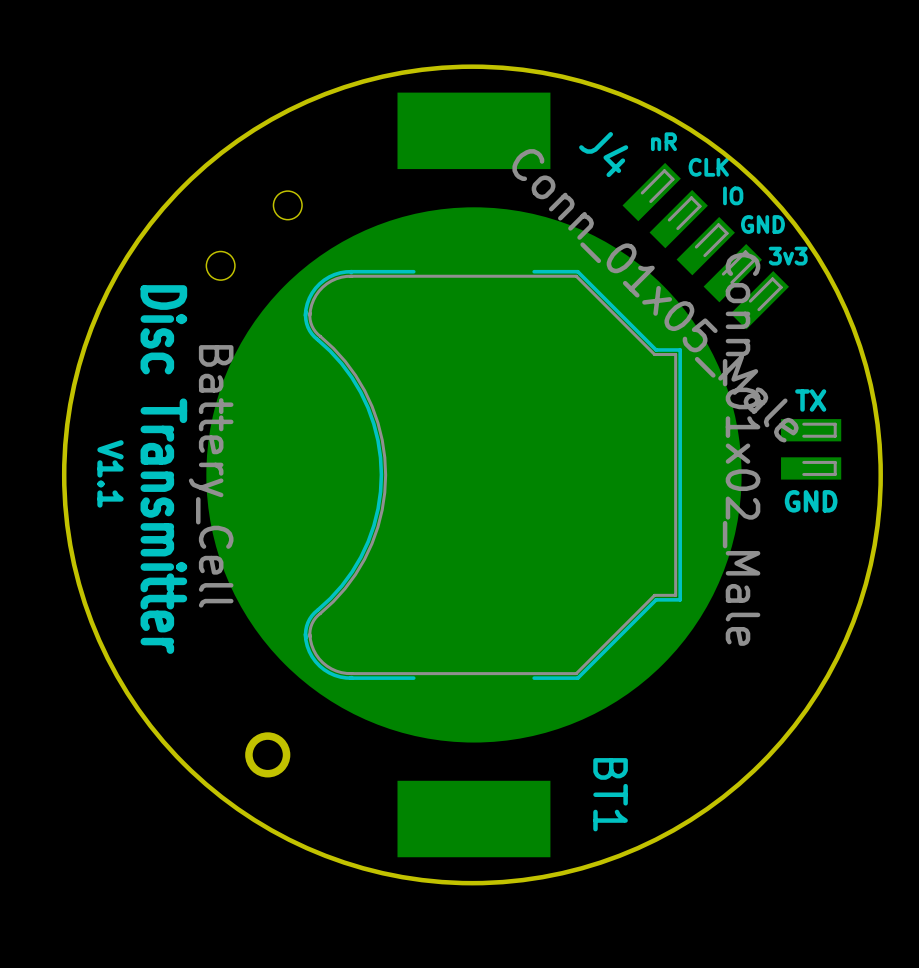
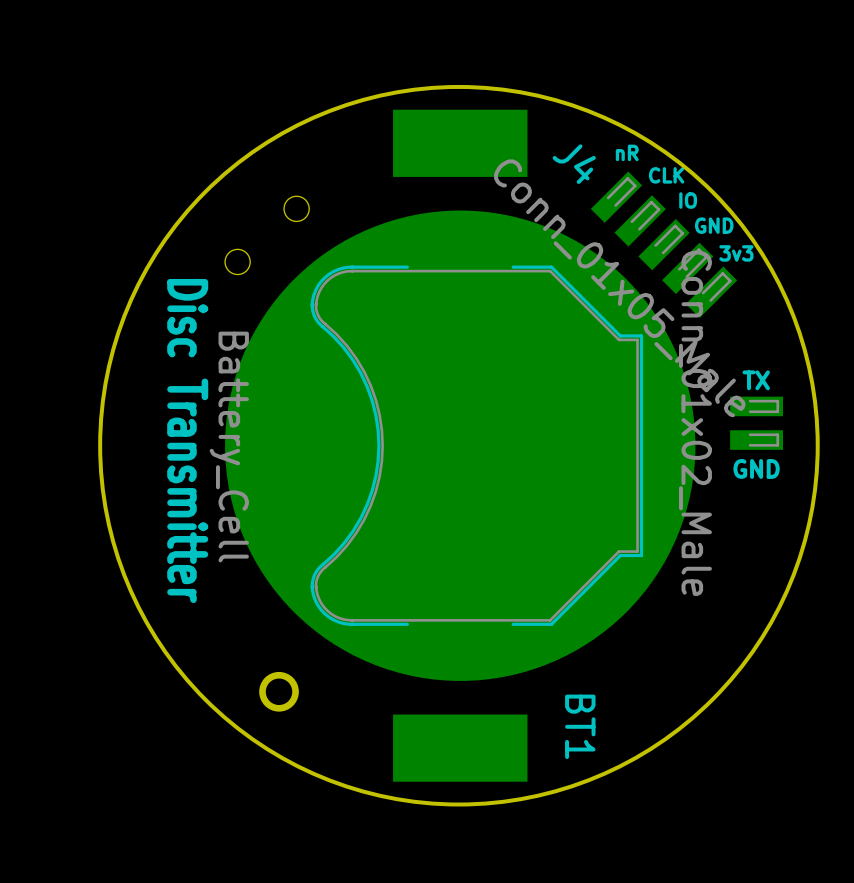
text: V1.1 (110, 473) -> none

